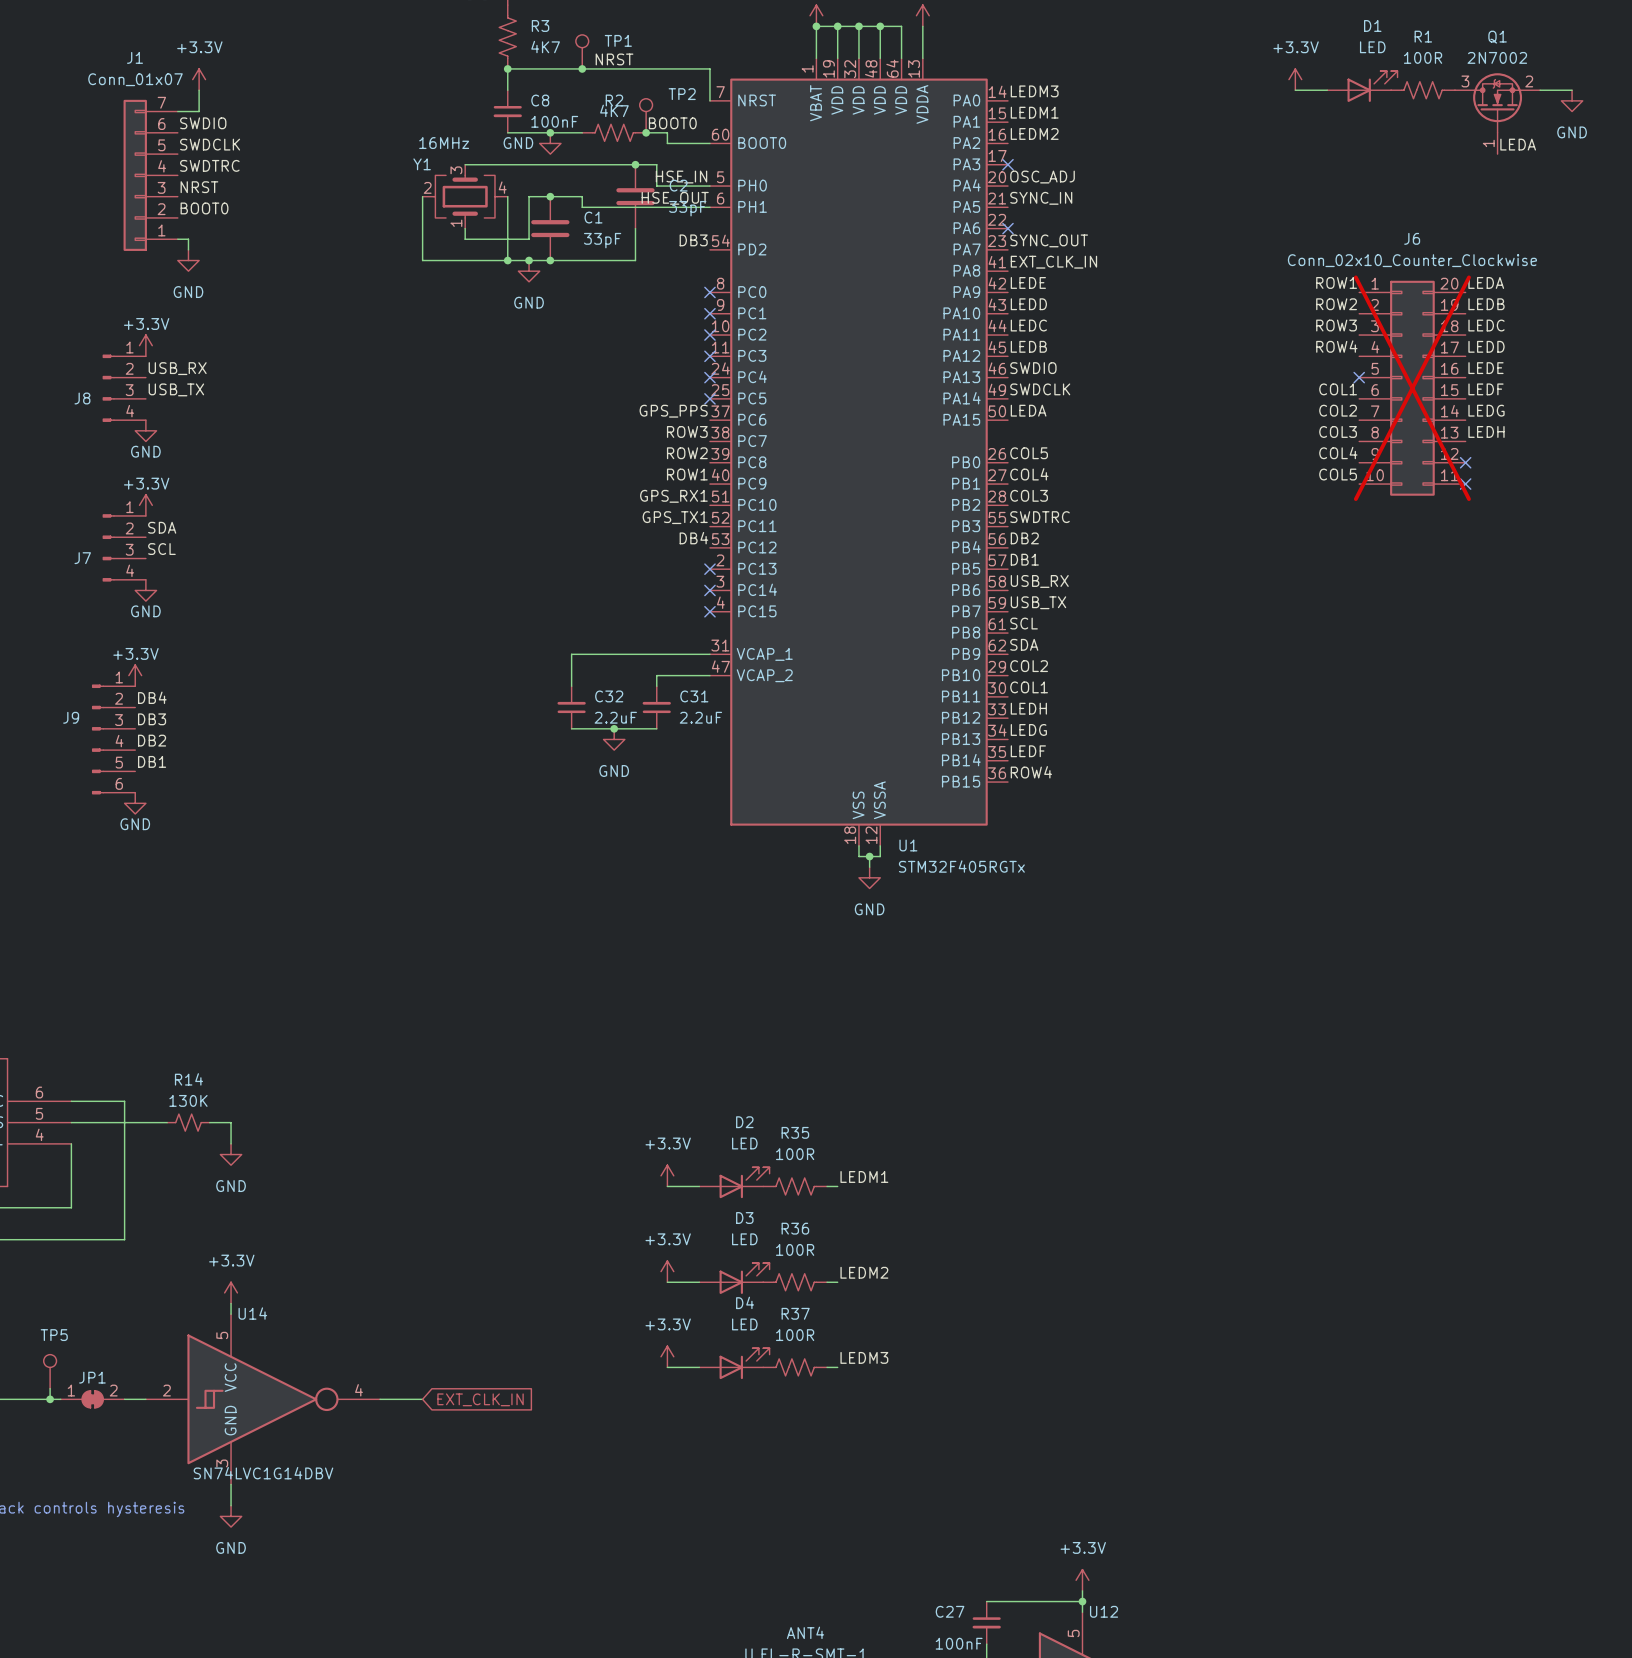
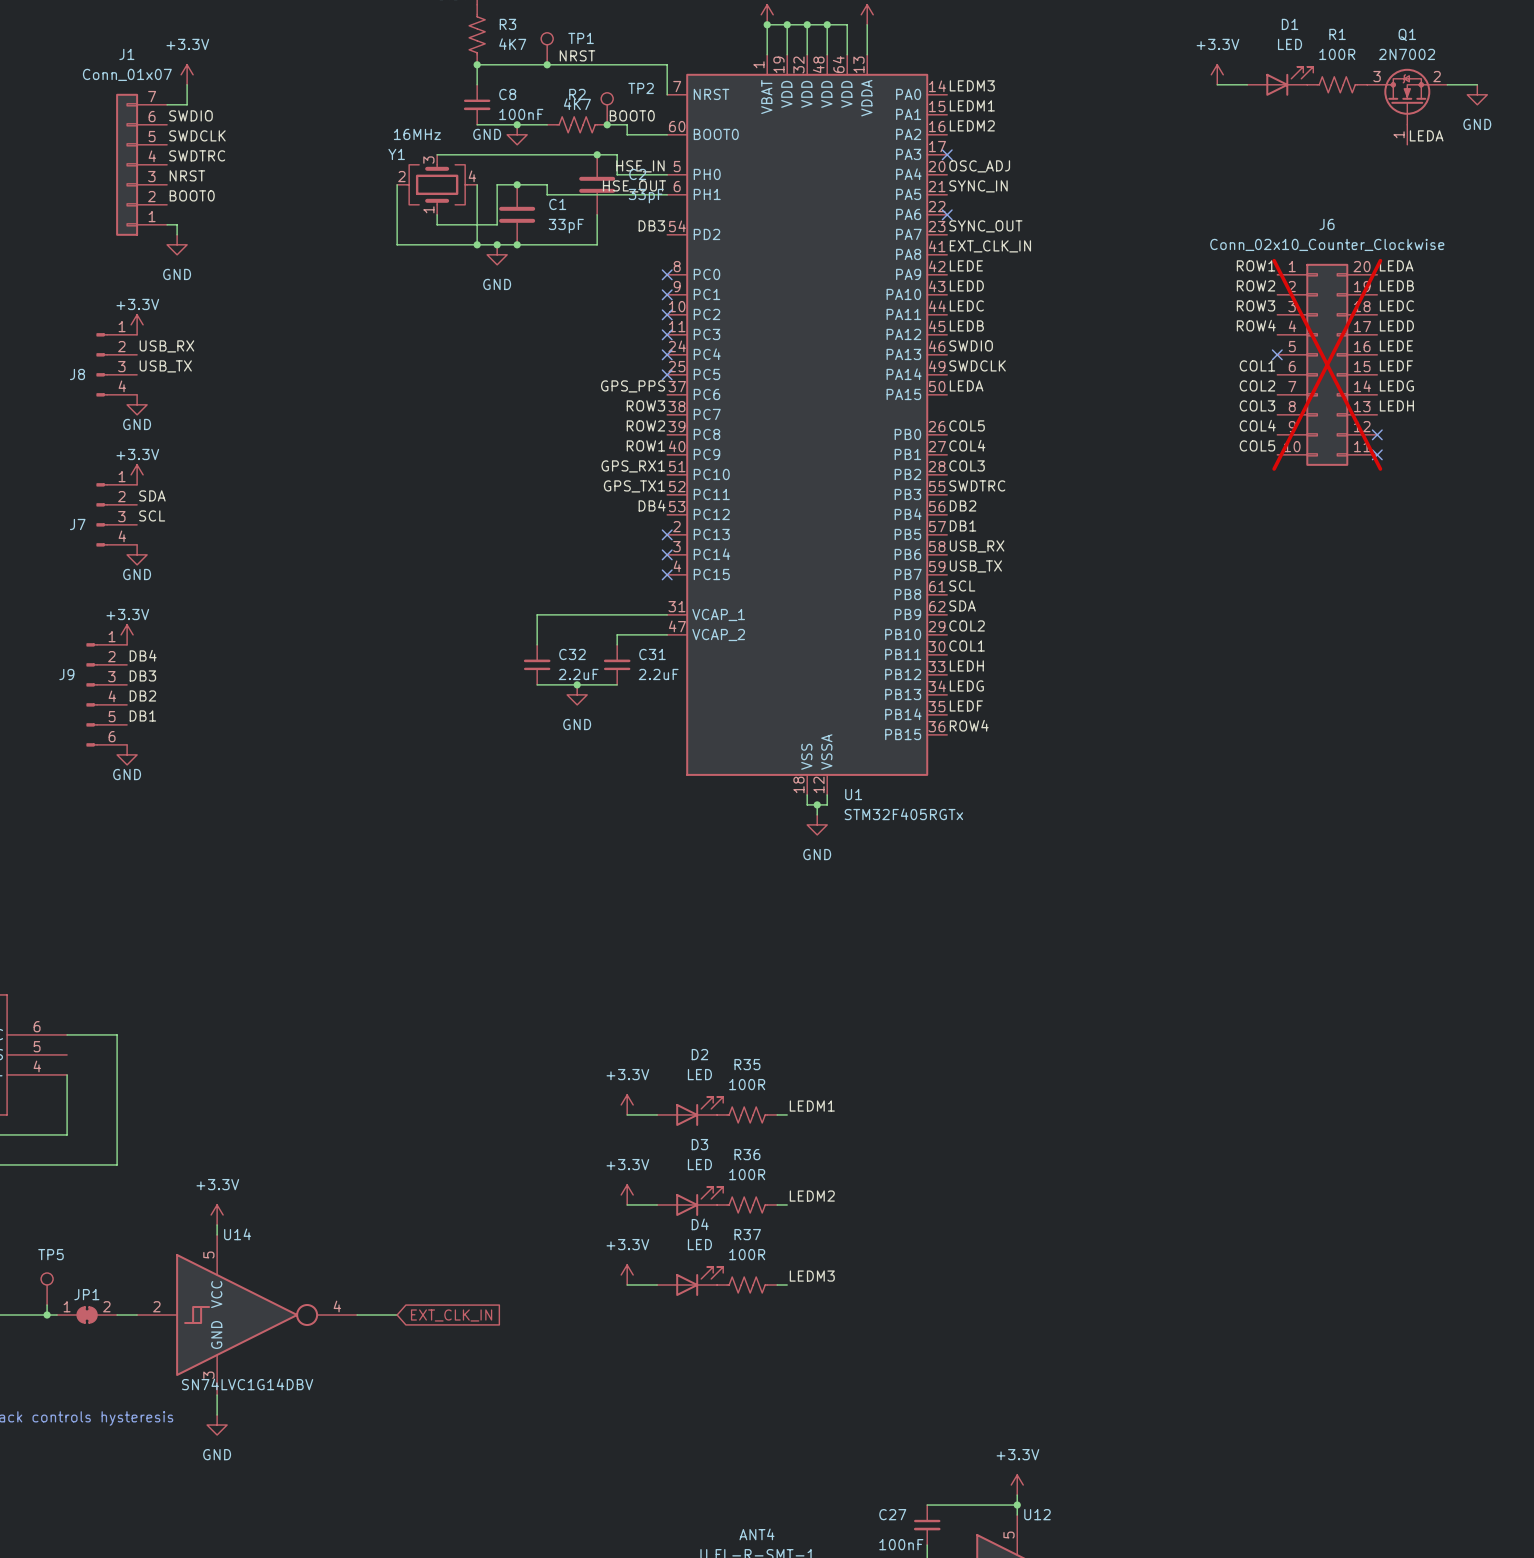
wire: (71, 1122) (167, 1122) -> none
R14: 130K (188, 1122) -> none
wire: (209, 1122) (231, 1122) (231, 1143) -> none
power symbol: GND (231, 1154) -> none

